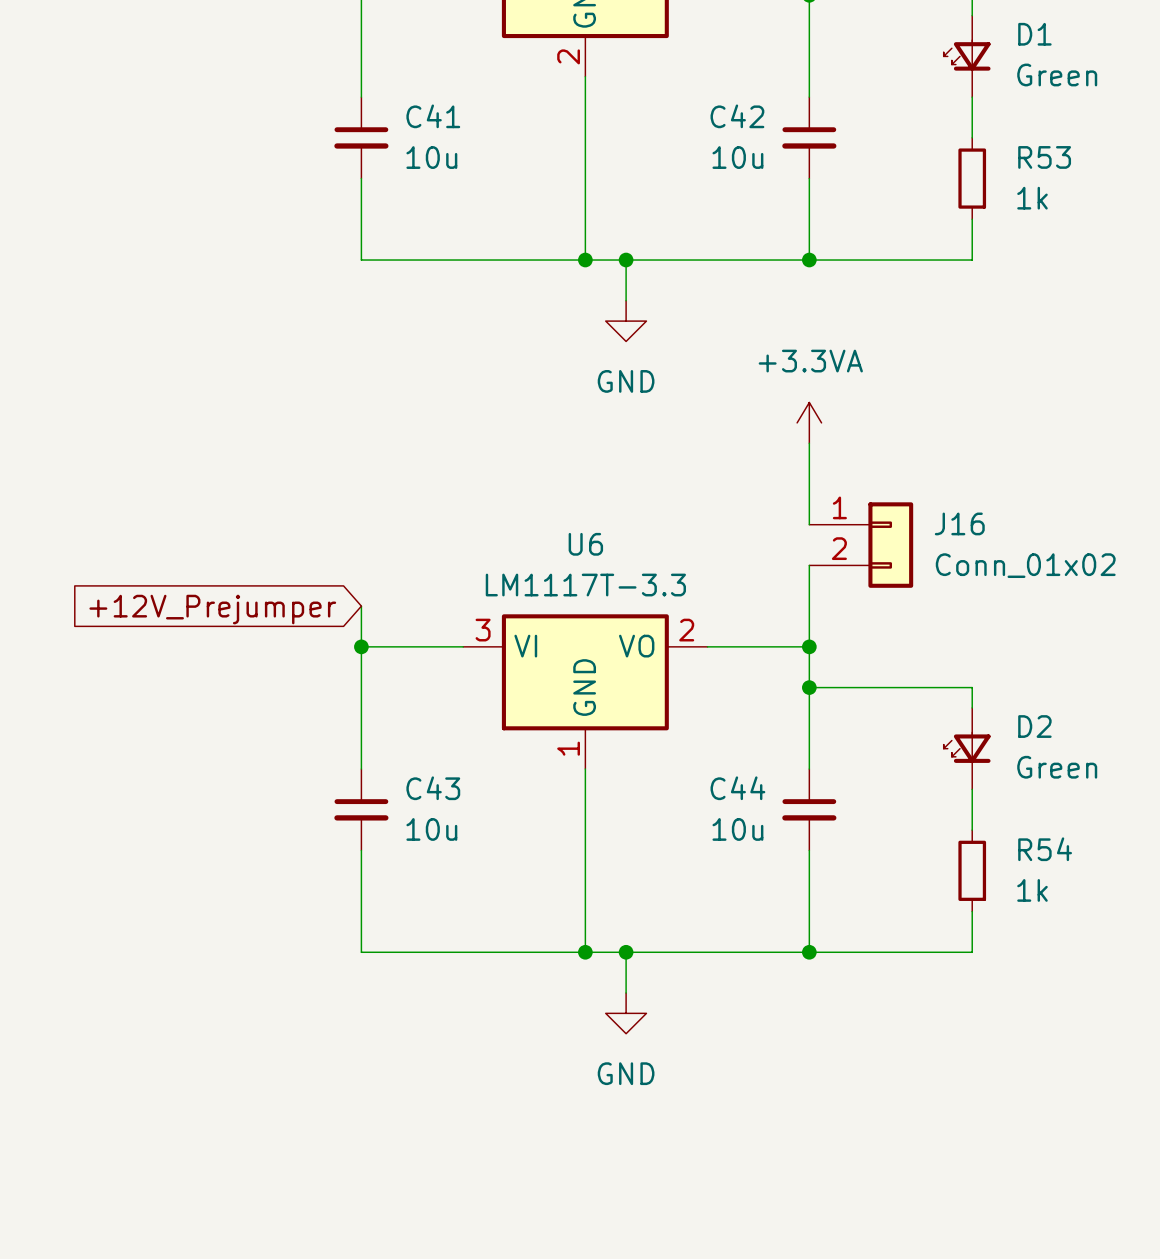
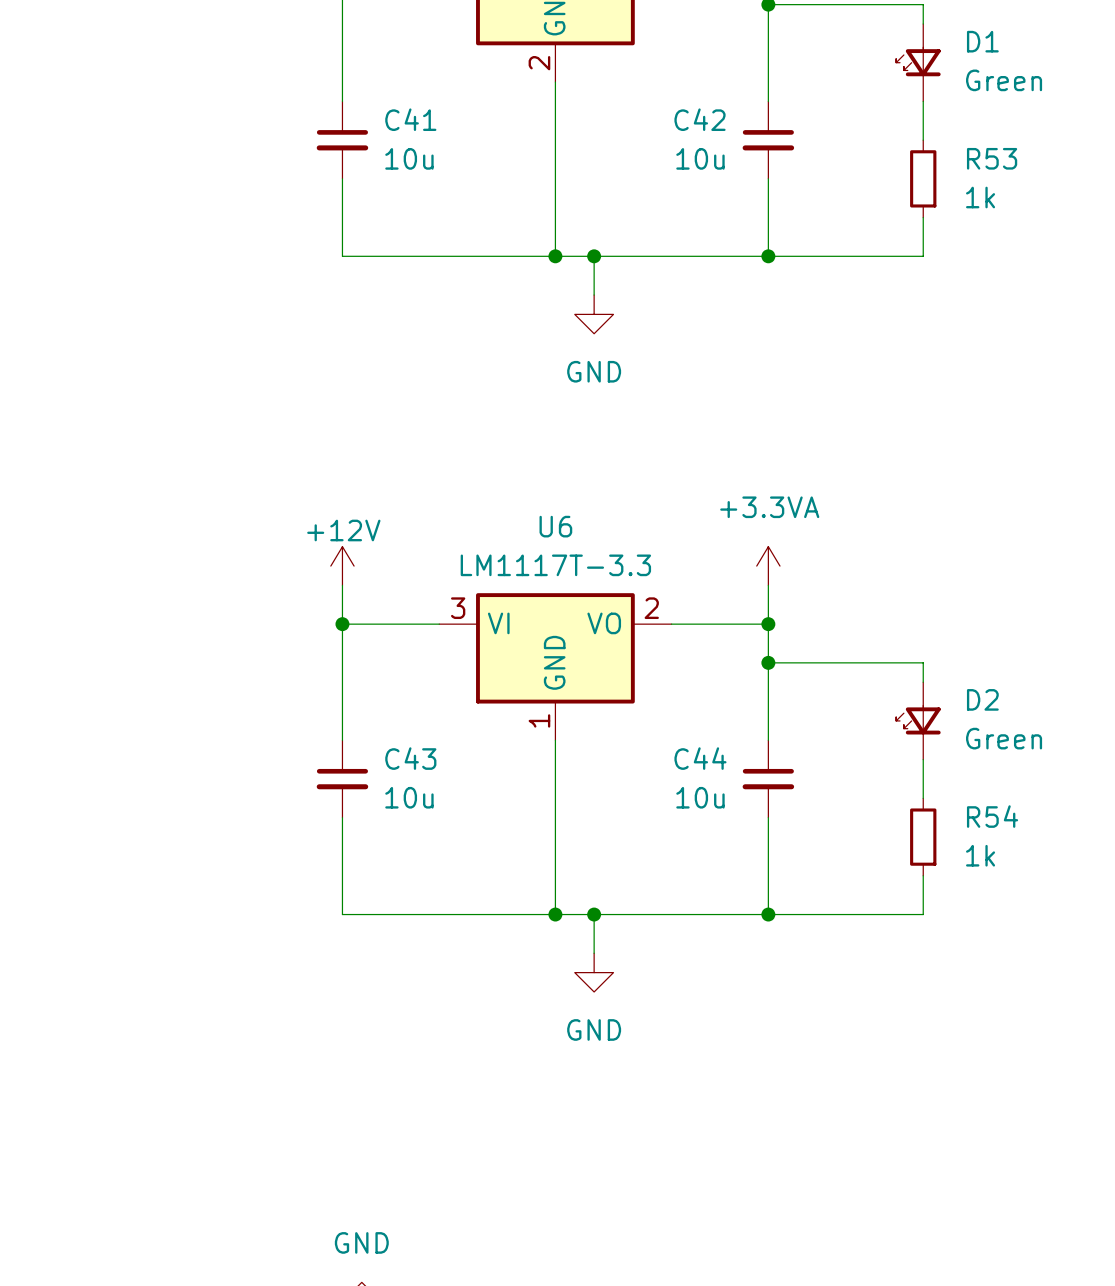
power symbol position: +3.3VA (809, 422) -> +3.3VA (768, 566)
wire: (809, 443) (809, 524) -> none
J16: Conn_01x02 (861, 545) -> none
power symbol: none -> +12V (342, 566)
global label: +12V_Prejumper (212, 609) -> none

